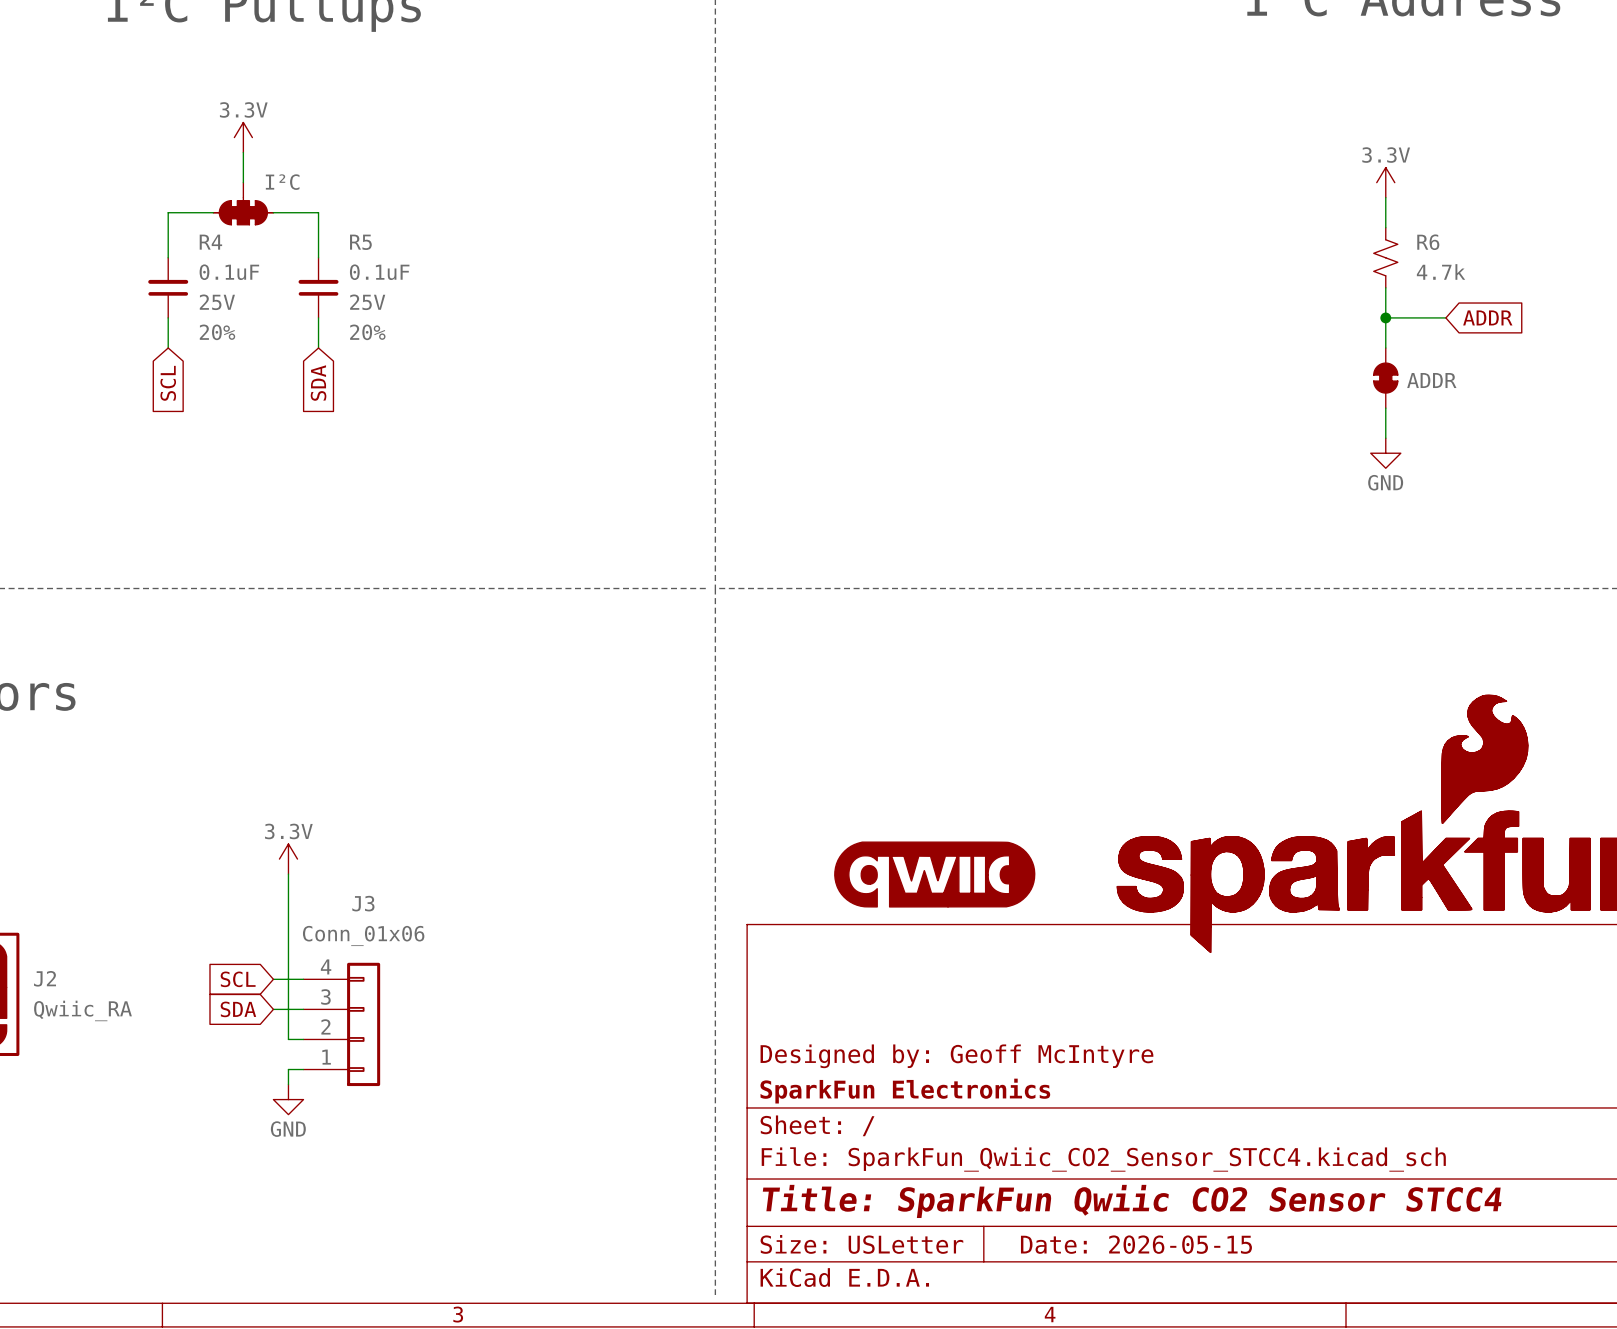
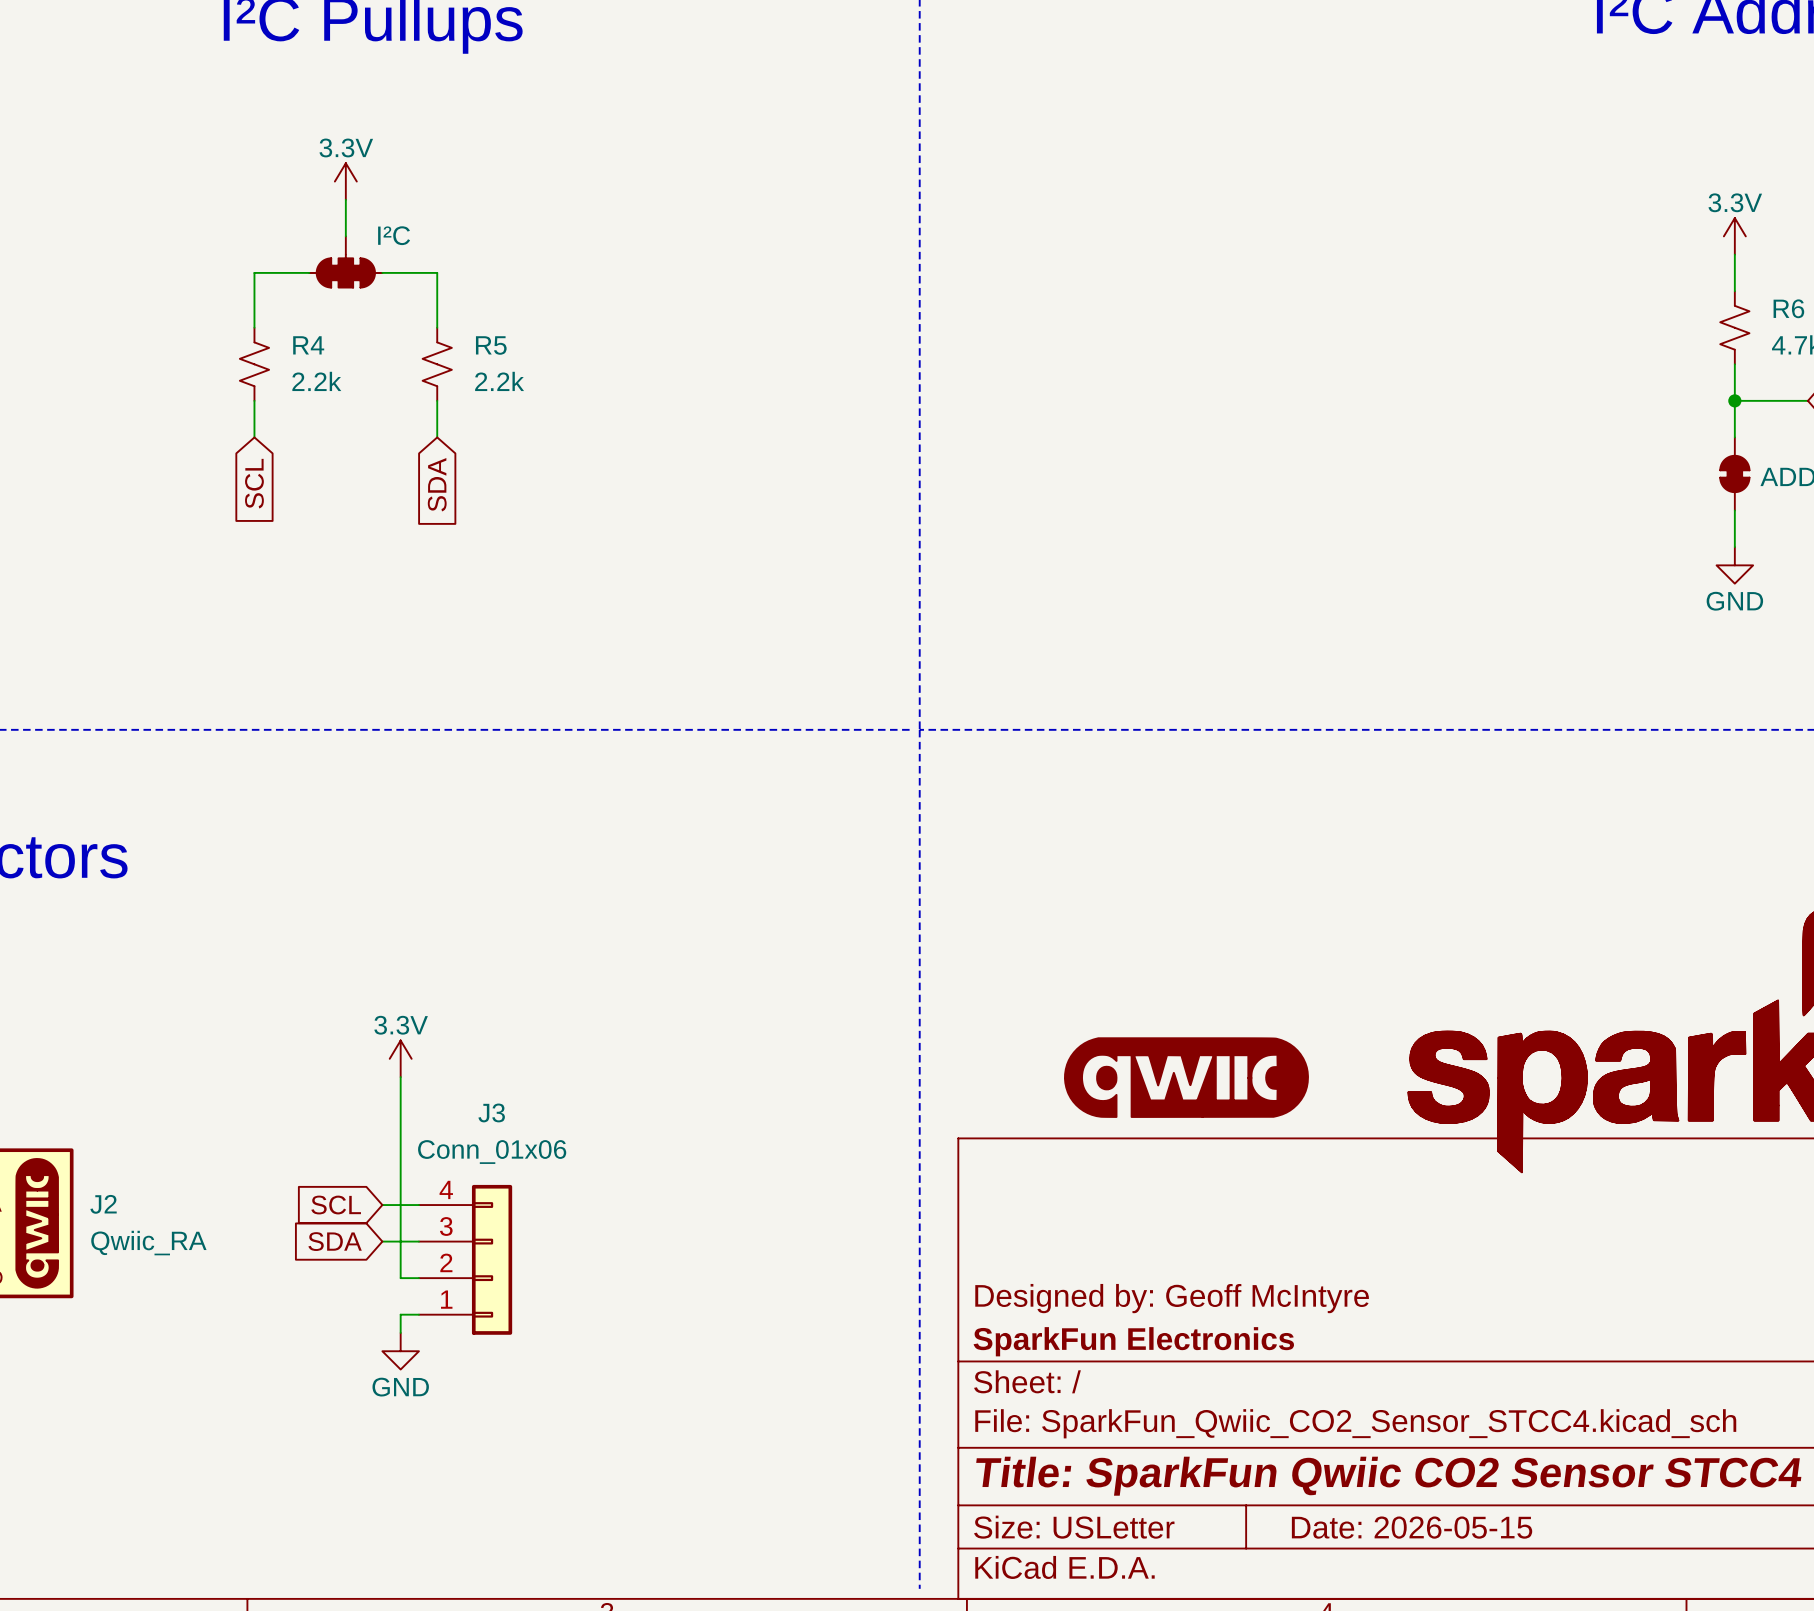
R4 name position: R4 (210, 242) -> R4 (308, 345)
R5 name position: R5 (360, 242) -> R5 (491, 345)
R4 symbol: [148, 257, 189, 318] -> [239, 327, 270, 401]
R5 symbol: [298, 257, 339, 318] -> [422, 327, 452, 401]
R4 value: 0.1uF (229, 272) -> 2.2k (316, 381)
R5 value: 0.1uF (379, 272) -> 2.2k (499, 381)
R4 text: 25V (217, 302) -> none
R5 text: 25V (367, 302) -> none
R4 text: 20% (217, 332) -> none
R5 text: 20% (367, 332) -> none

